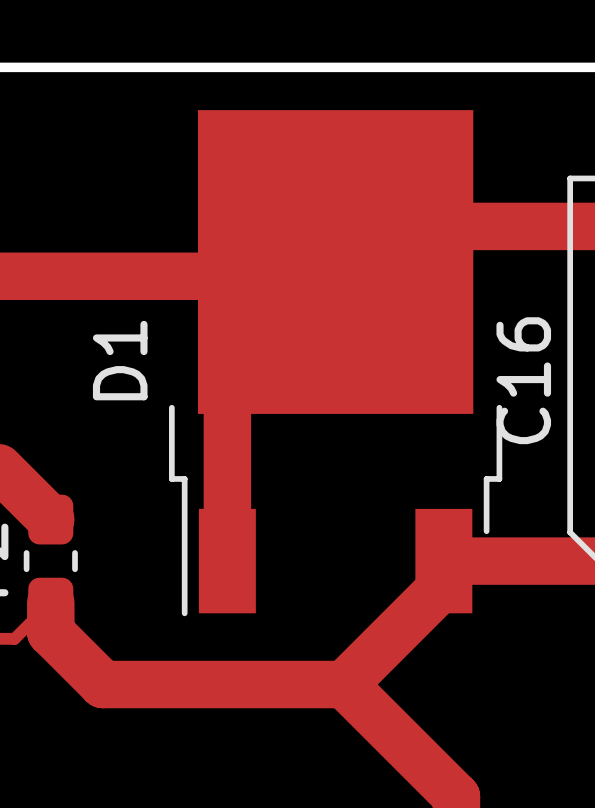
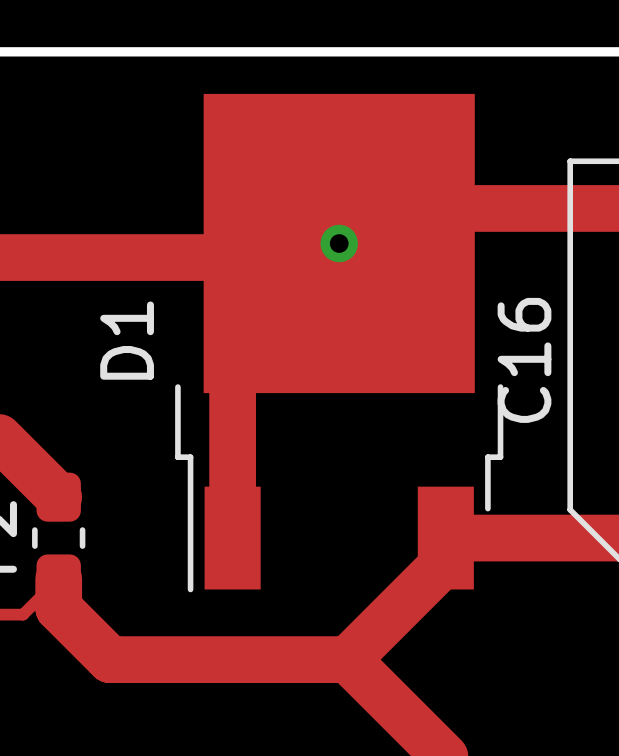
via: none -> (339, 243)

